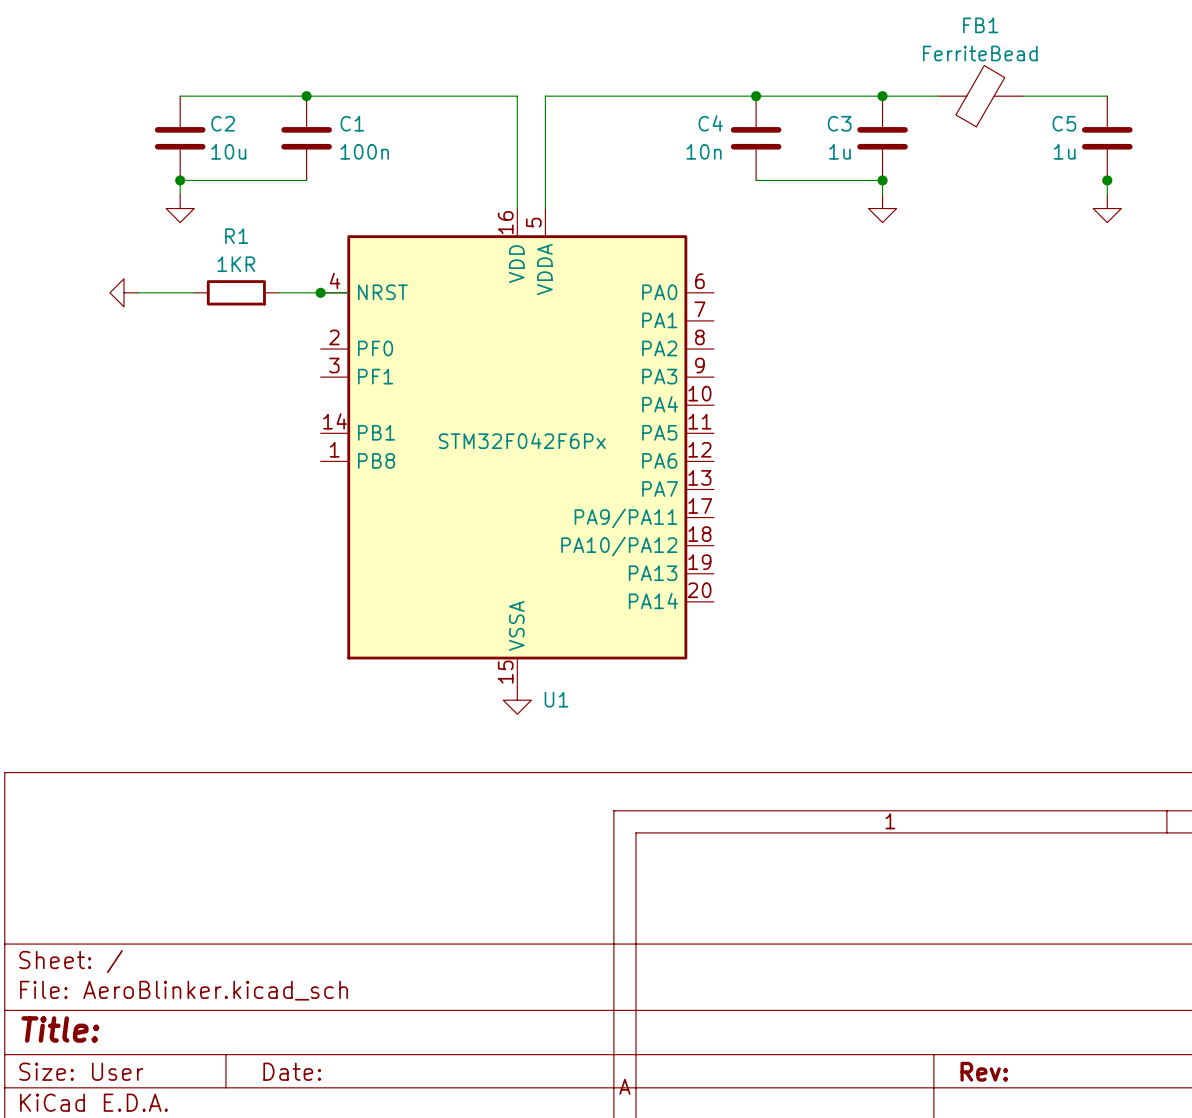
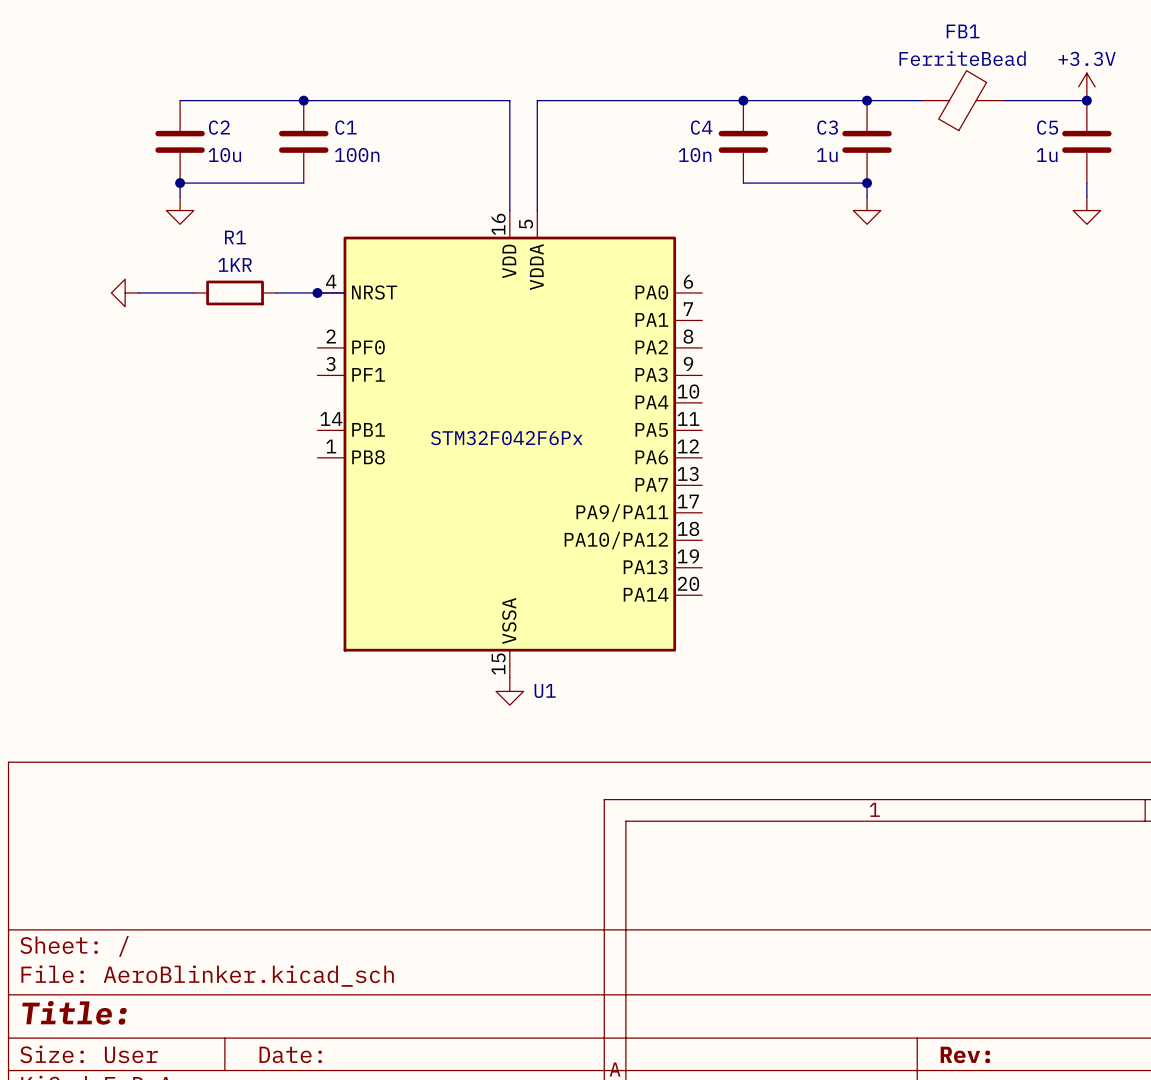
power symbol: none -> +3.3V (1086, 86)
junction: none -> (1086, 100)
junction: (1107, 180) -> none

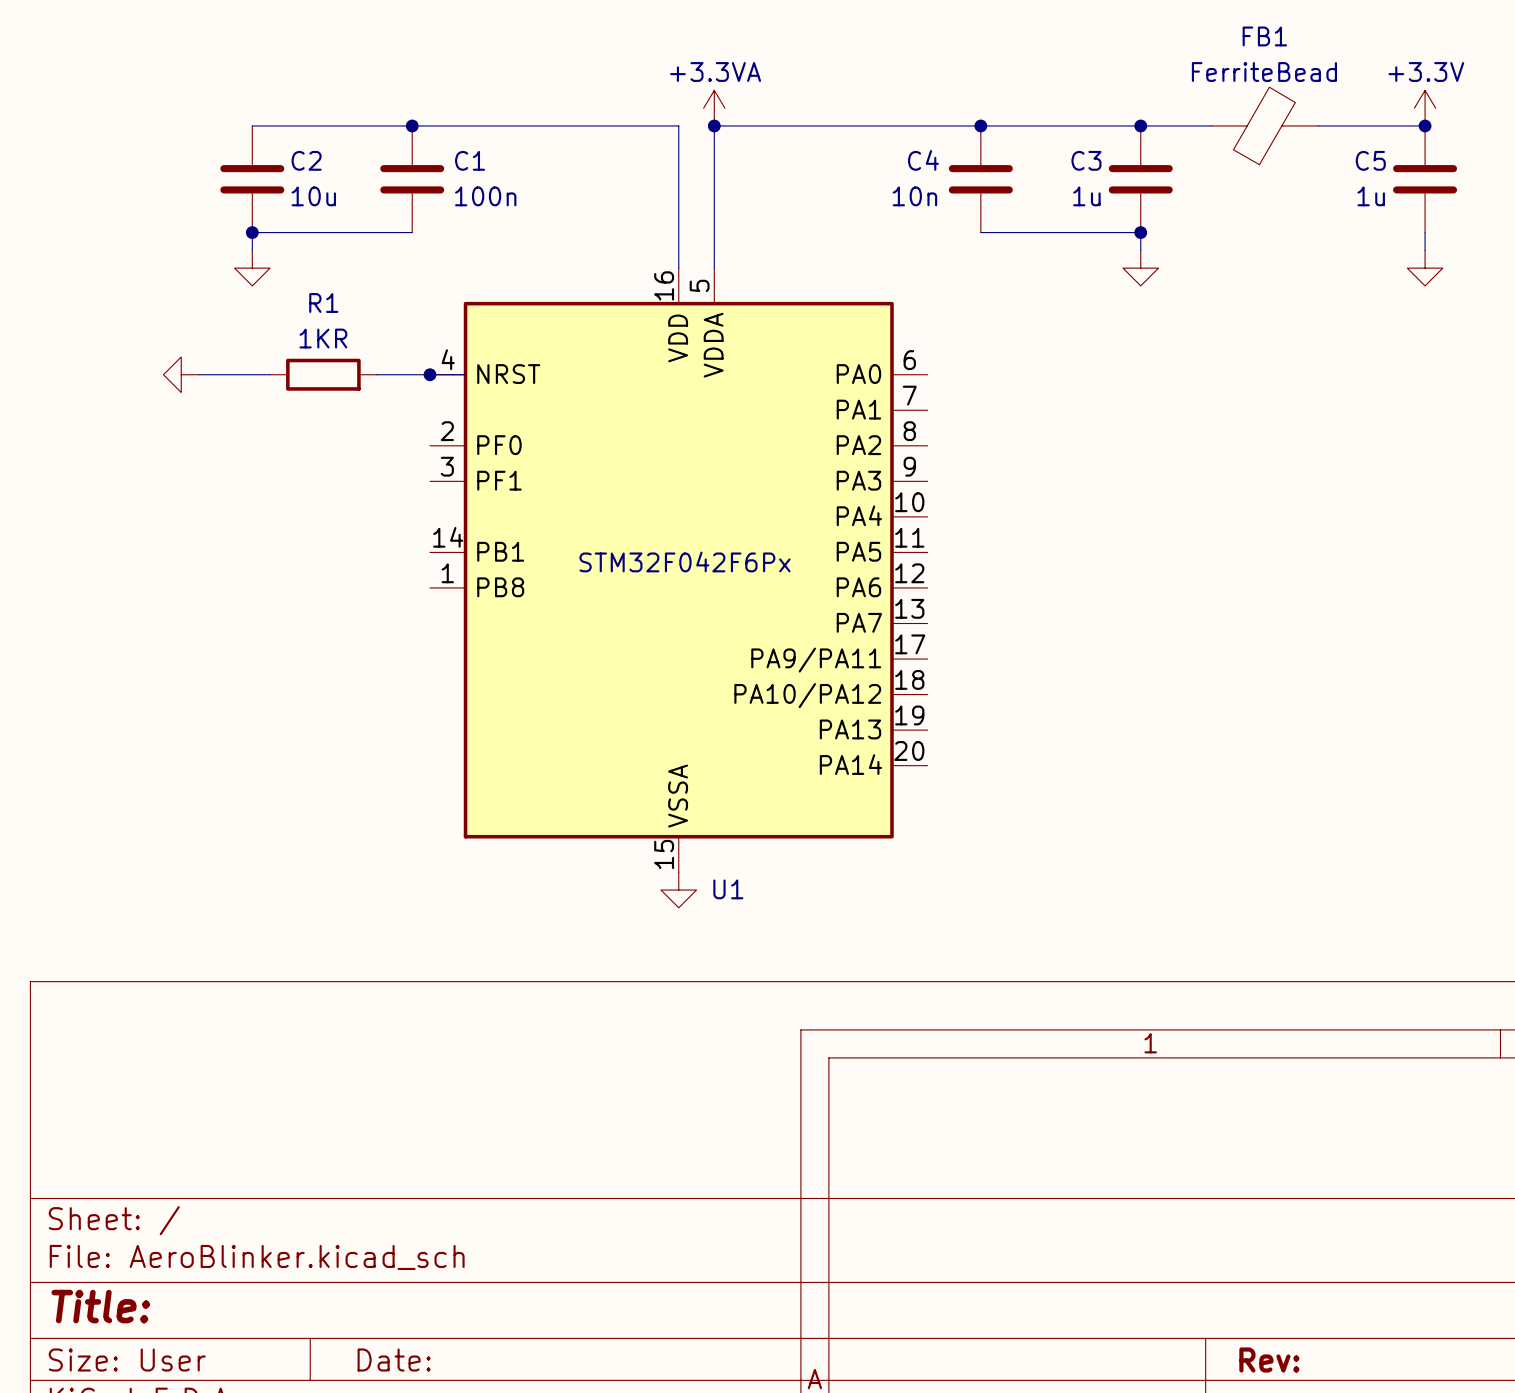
power symbol: none -> +3.3VA (714, 108)
junction: none -> (714, 125)

